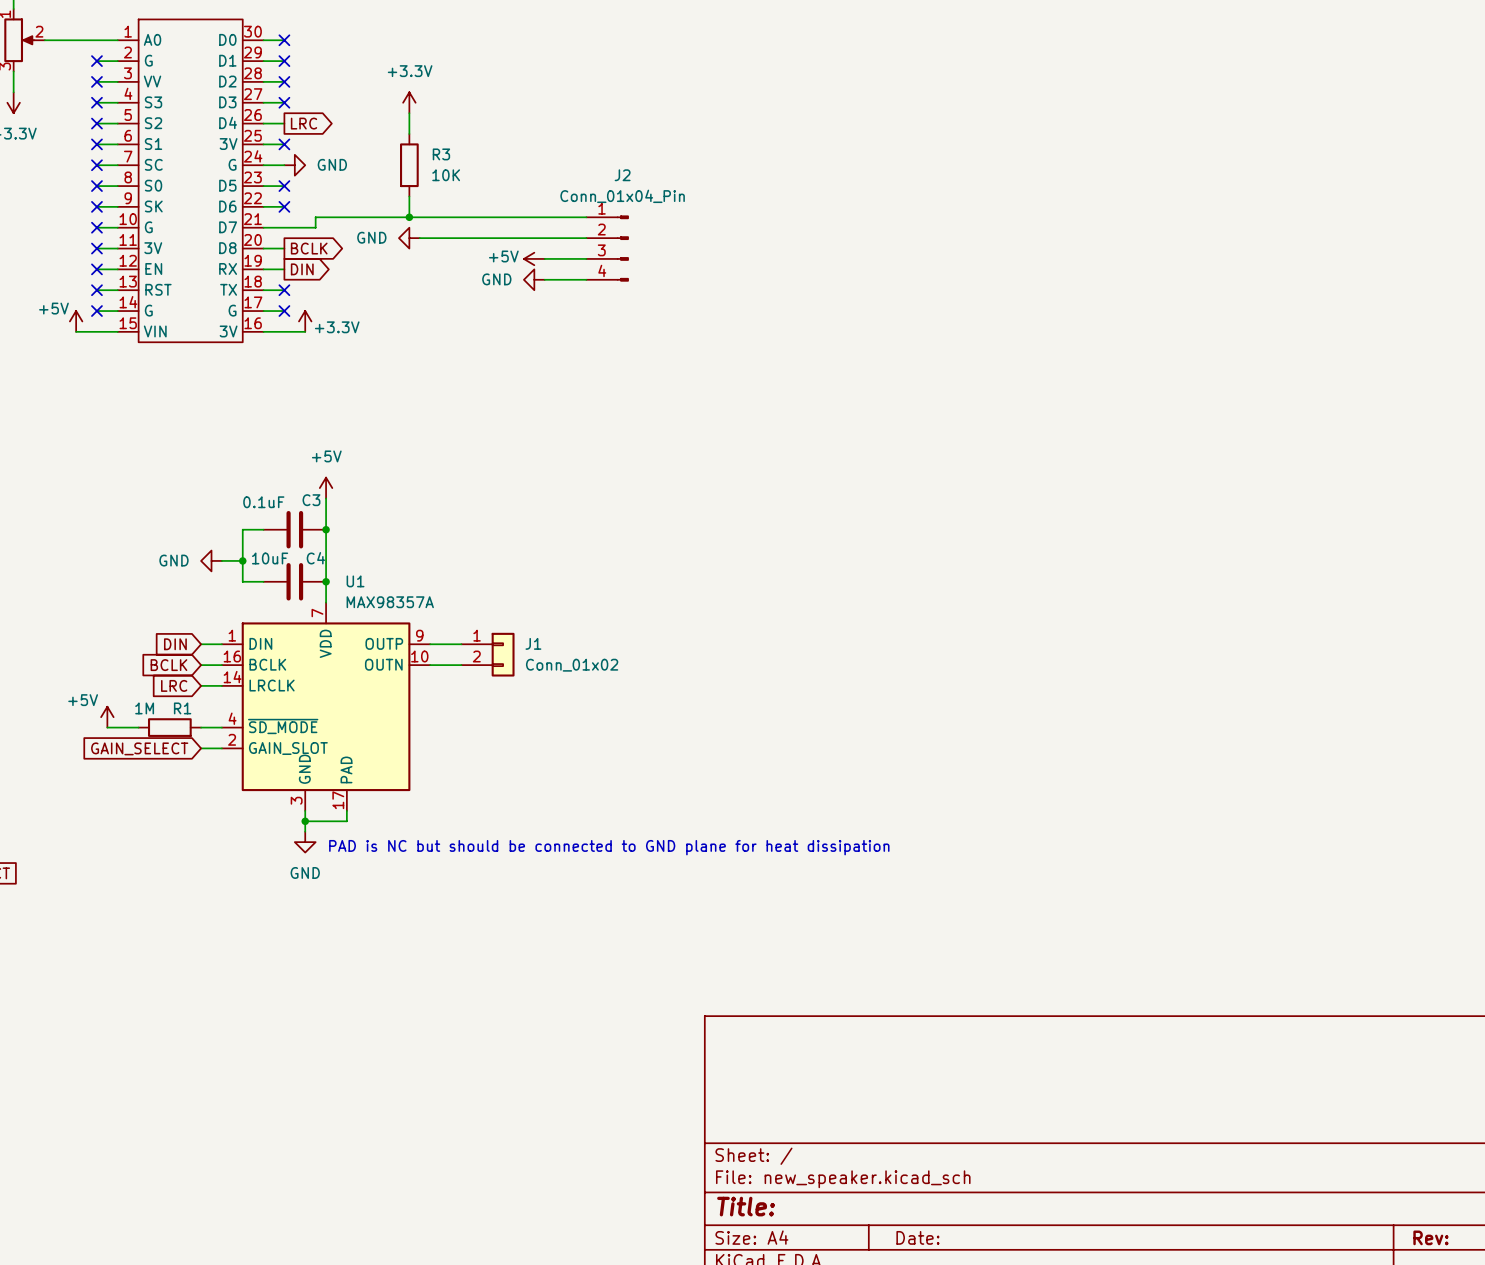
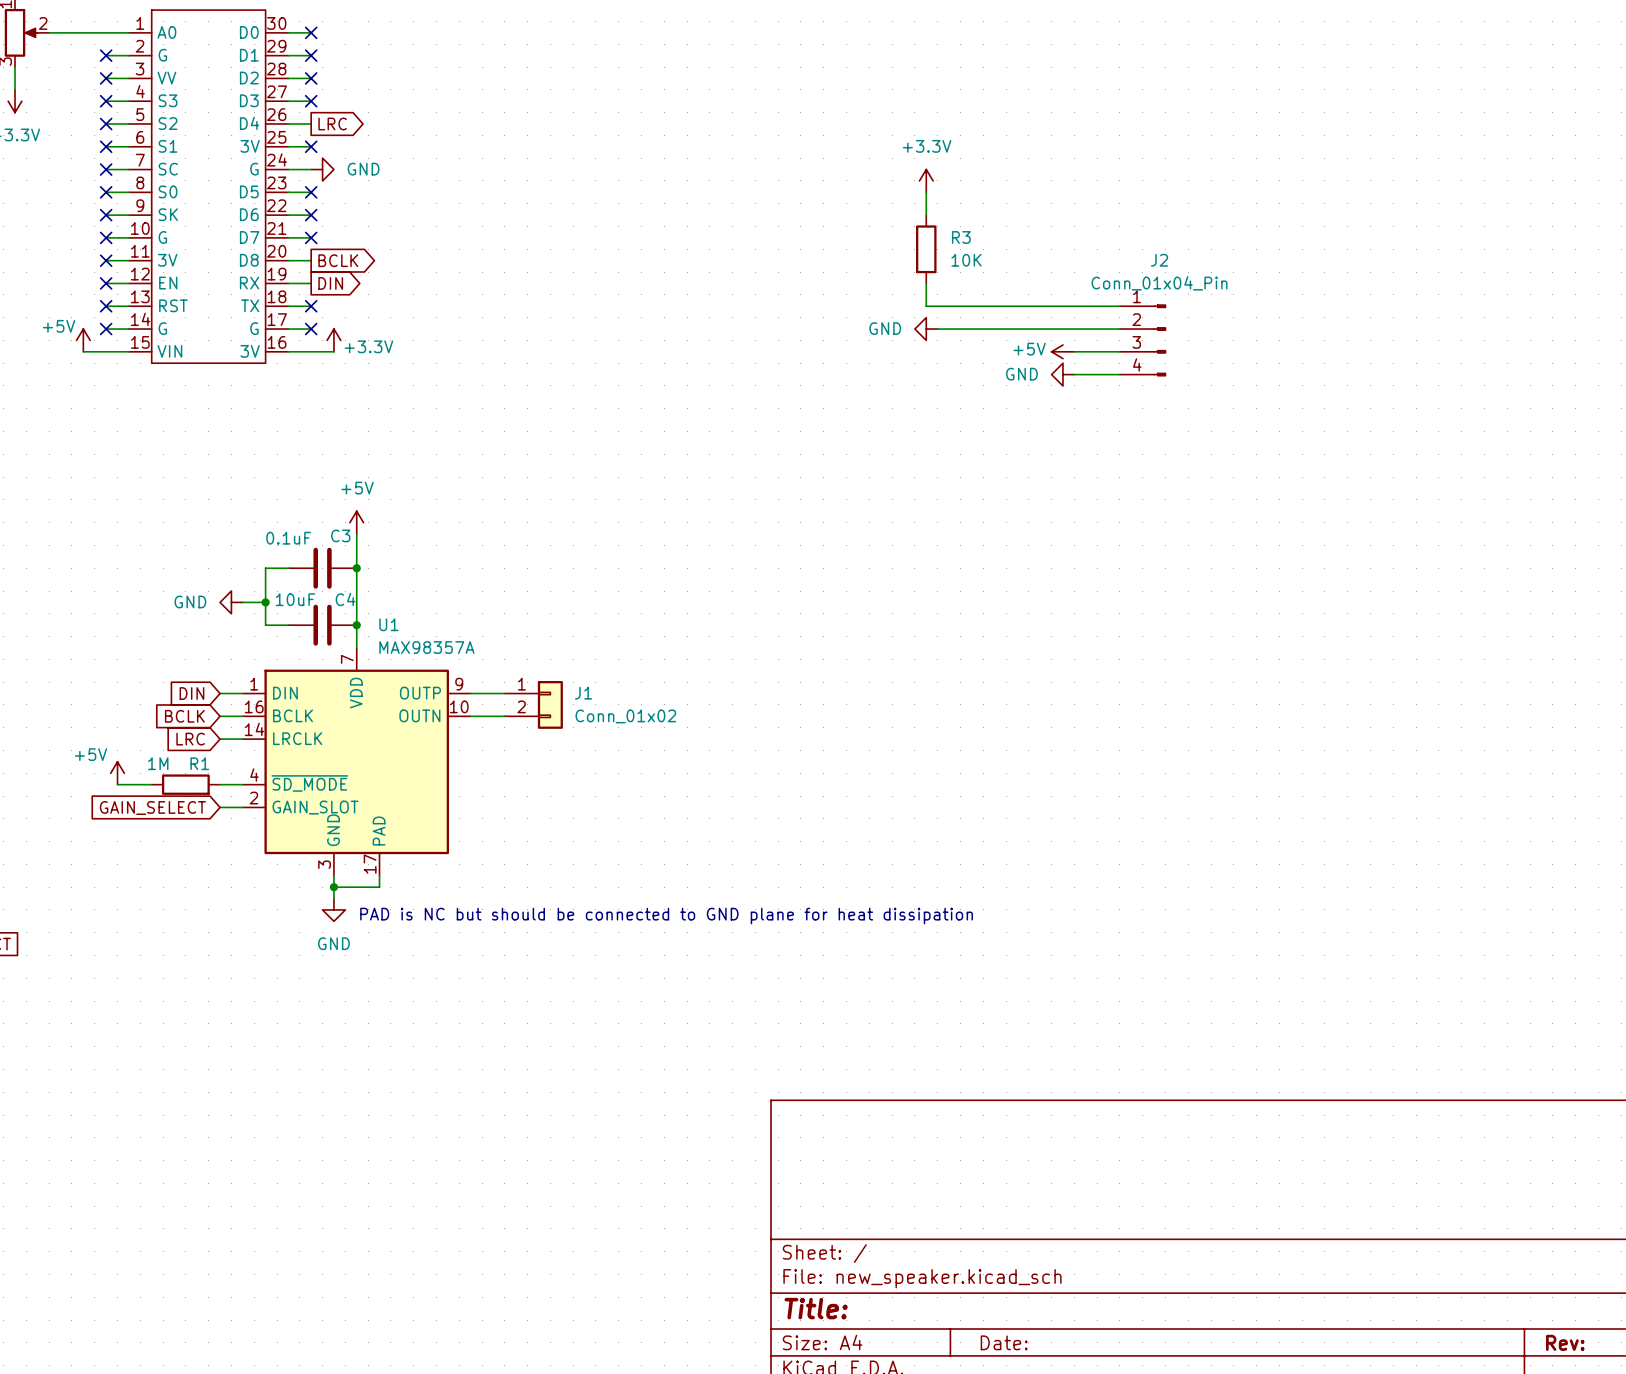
power symbol: +3.3V (409, 102) -> none
wire: (409, 113) (409, 133) -> none
R3 position: (409, 165) -> (926, 249)
power symbol: none -> +3.3V (926, 180)
wire: none -> (926, 192) (926, 215)
wire: (409, 196) (409, 217) -> none
junction: (409, 217) -> none
wire: (586, 217) (315, 217) (315, 227) (284, 227) -> none
no-connect mark: none -> (311, 237)
power symbol: GND (409, 238) -> none
wire: (419, 238) (586, 238) -> none
J2 position: (607, 248) -> (1143, 340)
power symbol: +5V (534, 258) -> none
wire: (544, 258) (586, 258) -> none
wire: none -> (926, 283) (926, 306) (1119, 306)
power symbol: GND (534, 279) -> none
wire: (544, 279) (586, 279) -> none
power symbol: none -> GND (926, 329)
wire: none -> (937, 329) (1119, 329)
power symbol: none -> +5V (1062, 351)
wire: none -> (1074, 351) (1119, 351)
power symbol: none -> GND (1062, 374)
wire: none -> (1074, 374) (1119, 374)

